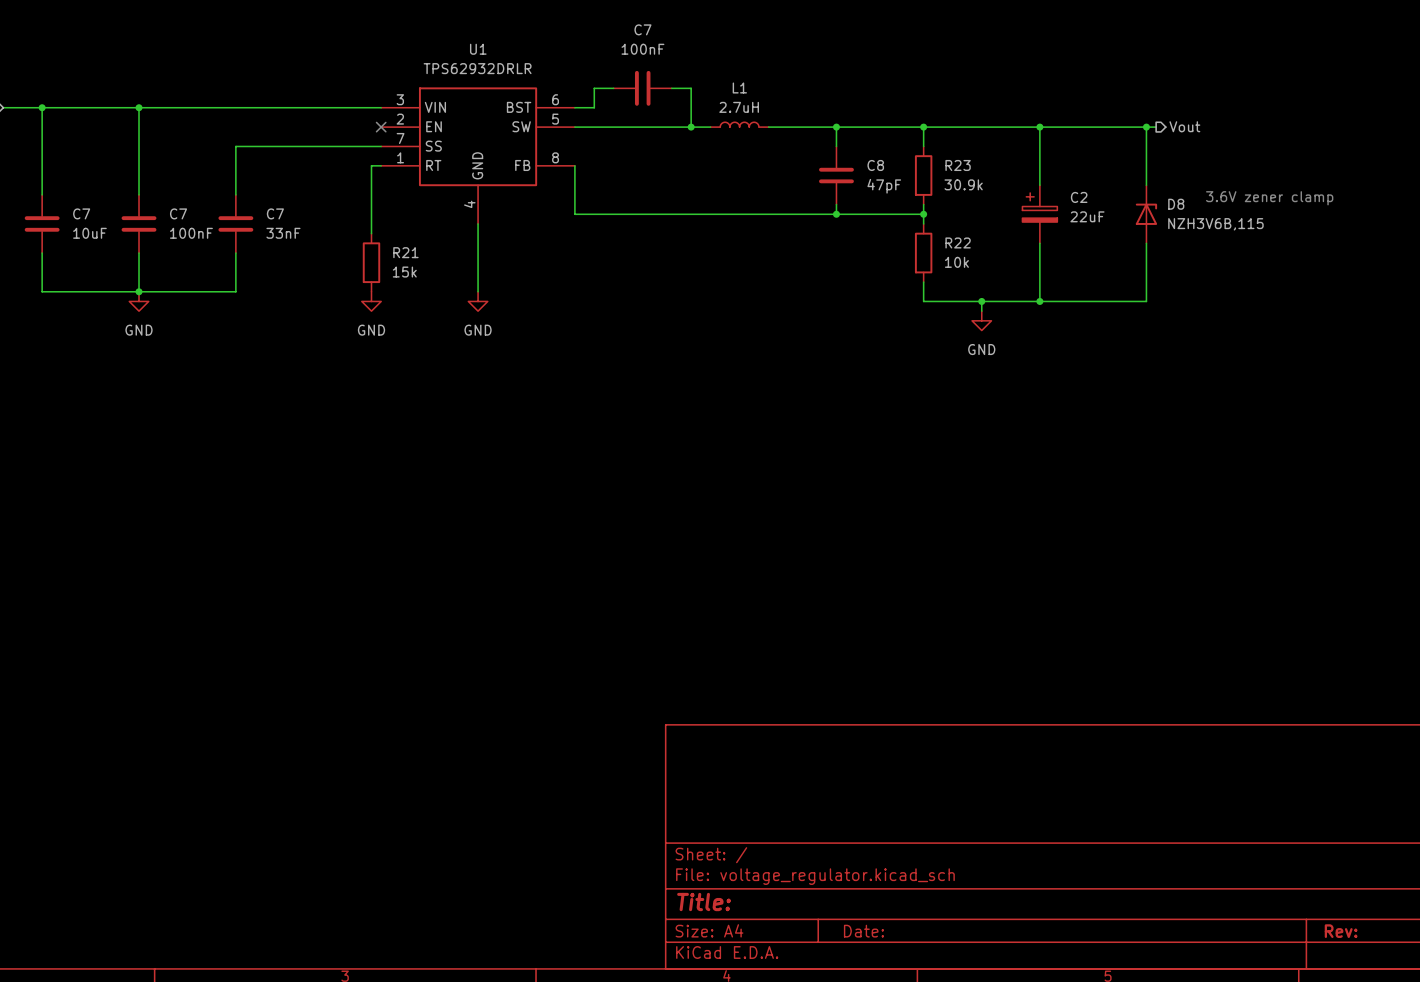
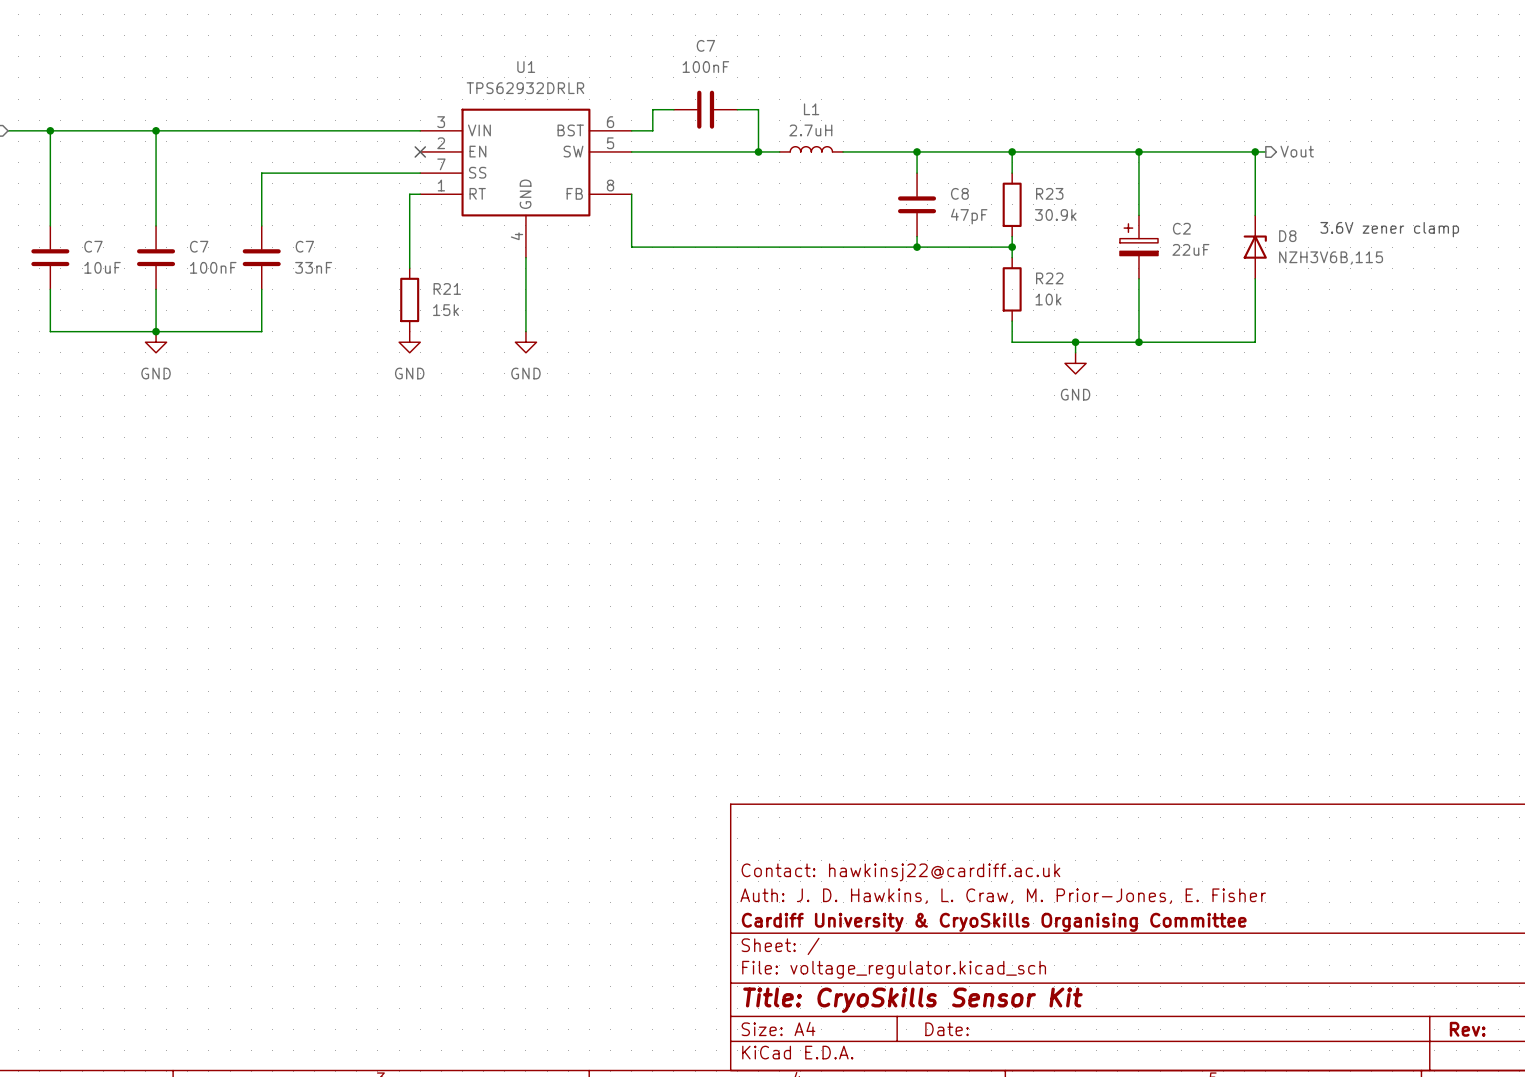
title block: none -> Contact: hawkinsj22@cardiff.ac.uk (900, 872)
title block: none -> Auth: J. D. Hawkins, L. Craw, M. Prior-Jones, E. Fisher (1003, 896)
title block: none -> Cardiff University & CryoSkills Organising Committee (994, 922)
title block: Title: (704, 902) -> Title: CryoSkills Sensor Kit (912, 1000)

